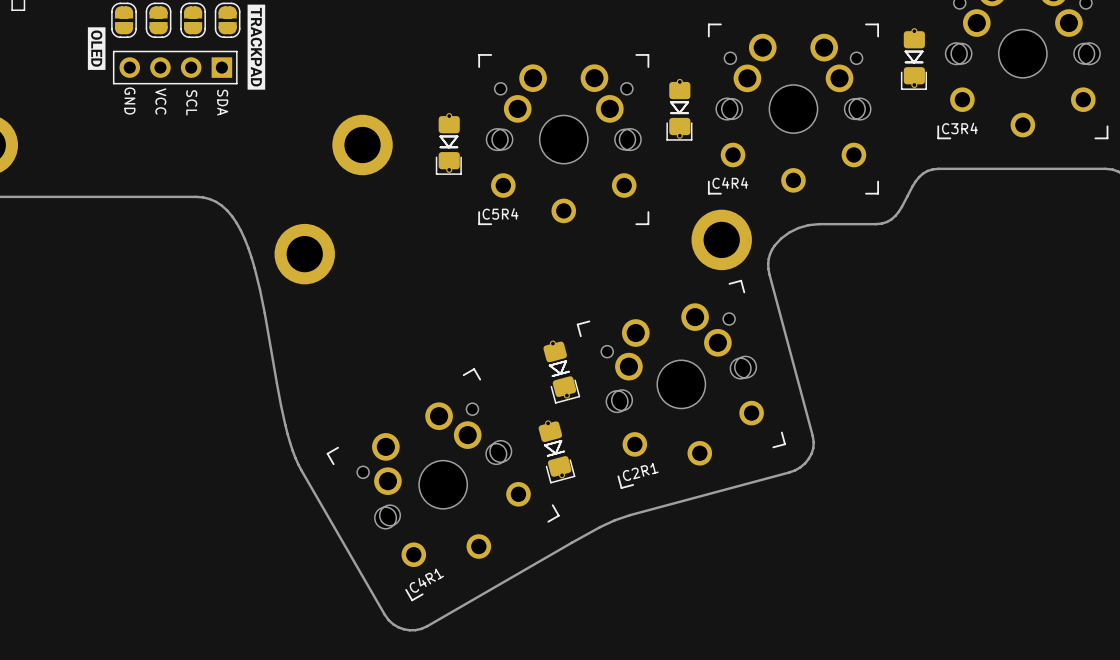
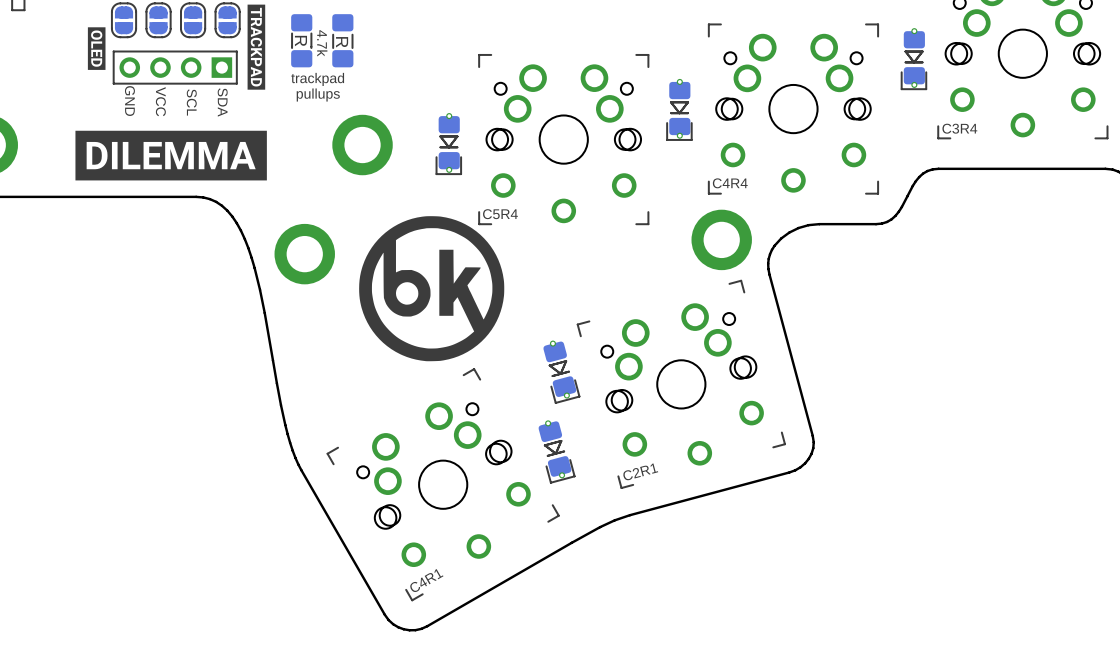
part: none -> (301, 40)
part: none -> (342, 40)
text: none -> 4.7k (322, 43)
text: none -> trackpad (317, 79)
text: none -> pullups (318, 95)
drawing: none -> [75, 130, 267, 181]
drawing: none -> [359, 216, 505, 362]

